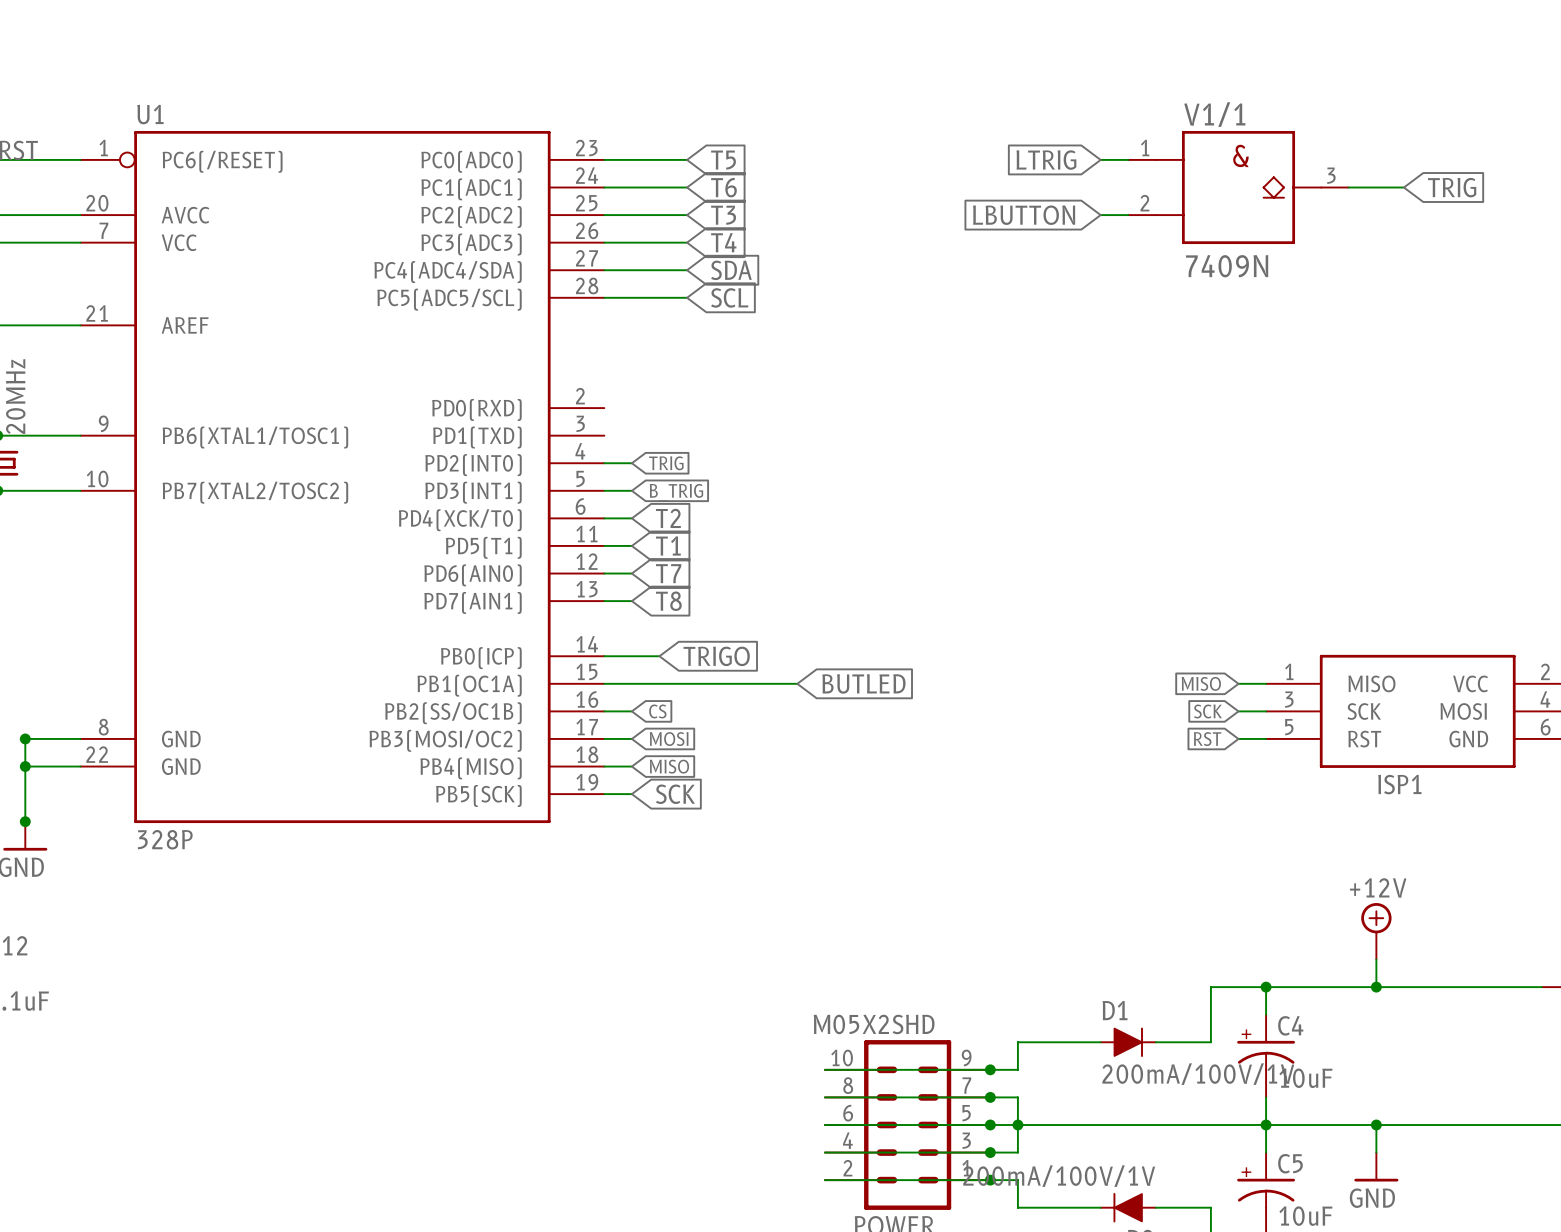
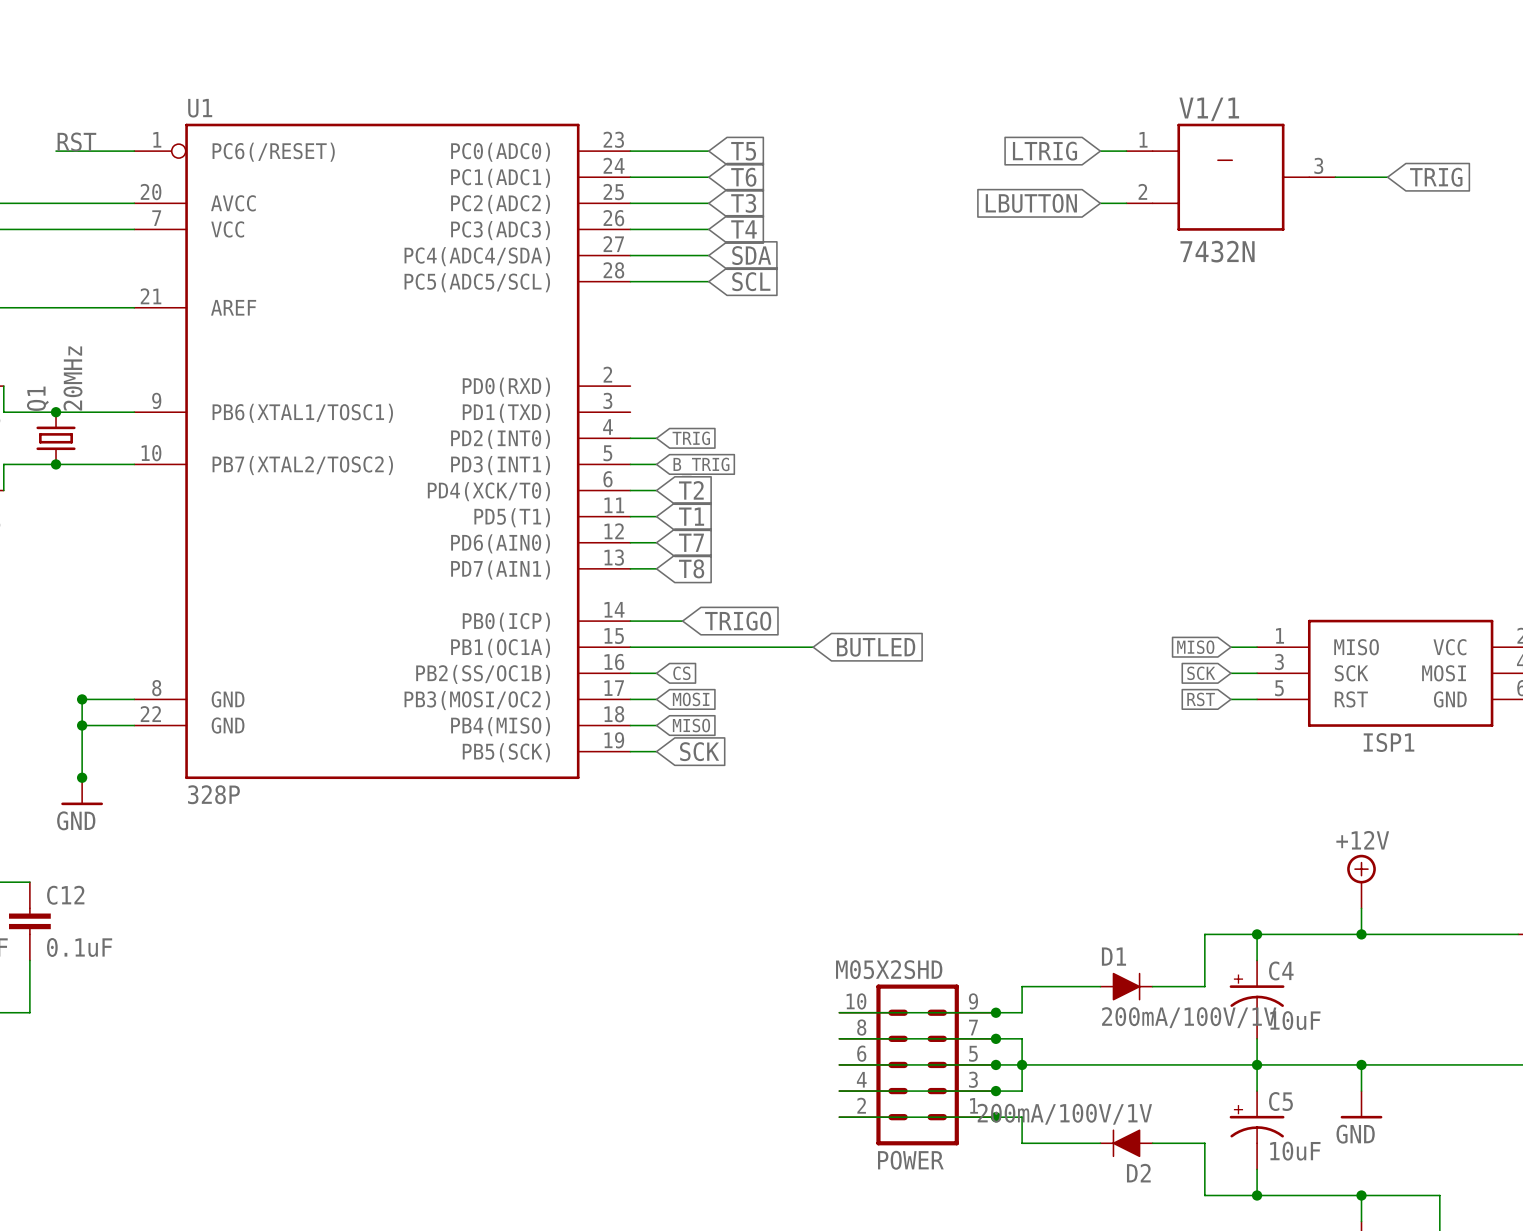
V1/1 symbol: [1128, 130, 1349, 245] -> [1126, 123, 1336, 231]
V1/1 value: 7409N (1227, 266) -> 7432N (1217, 251)

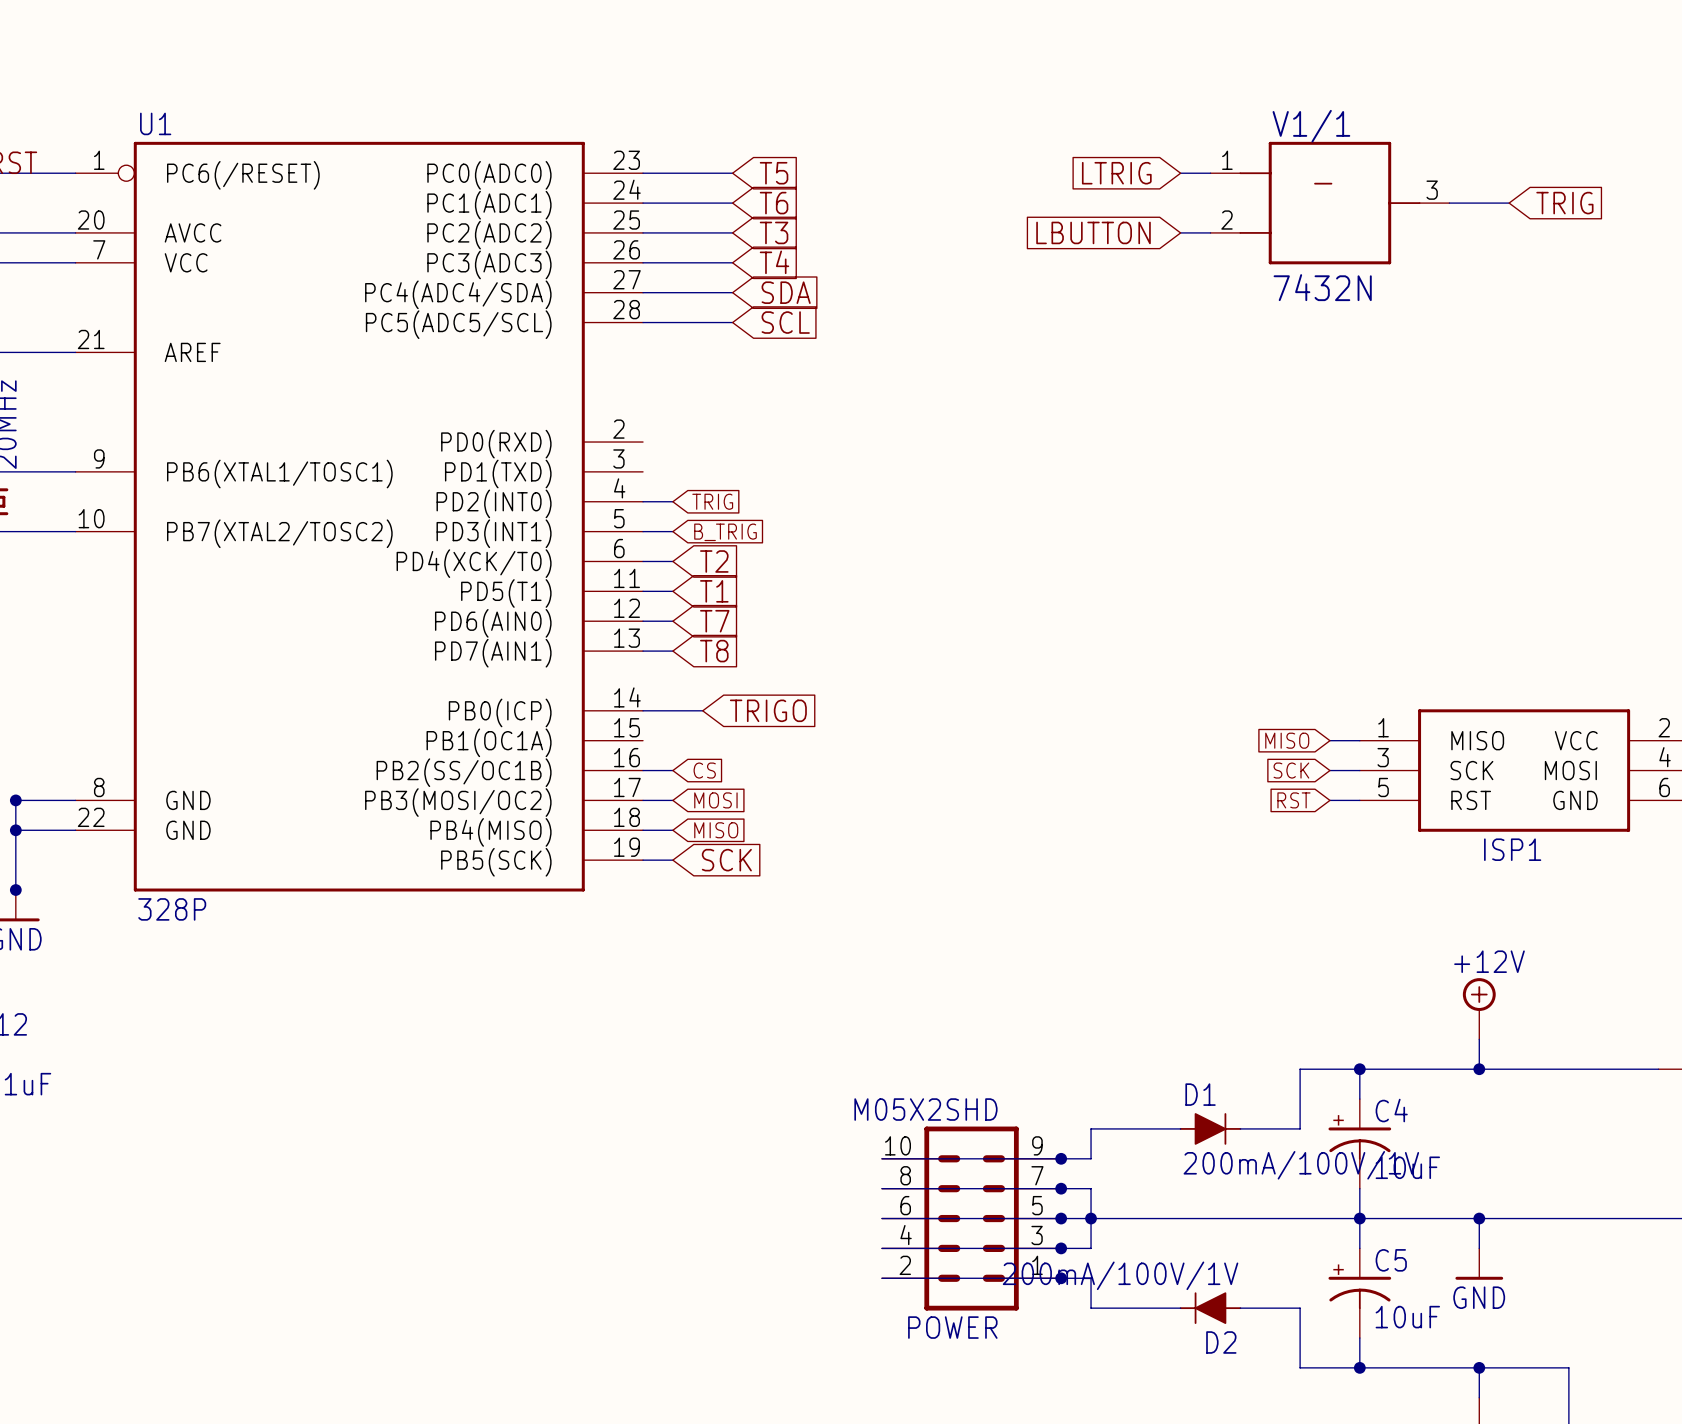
wire: (630, 647) (813, 647) -> none
global label: BUTLED (876, 647) -> none

